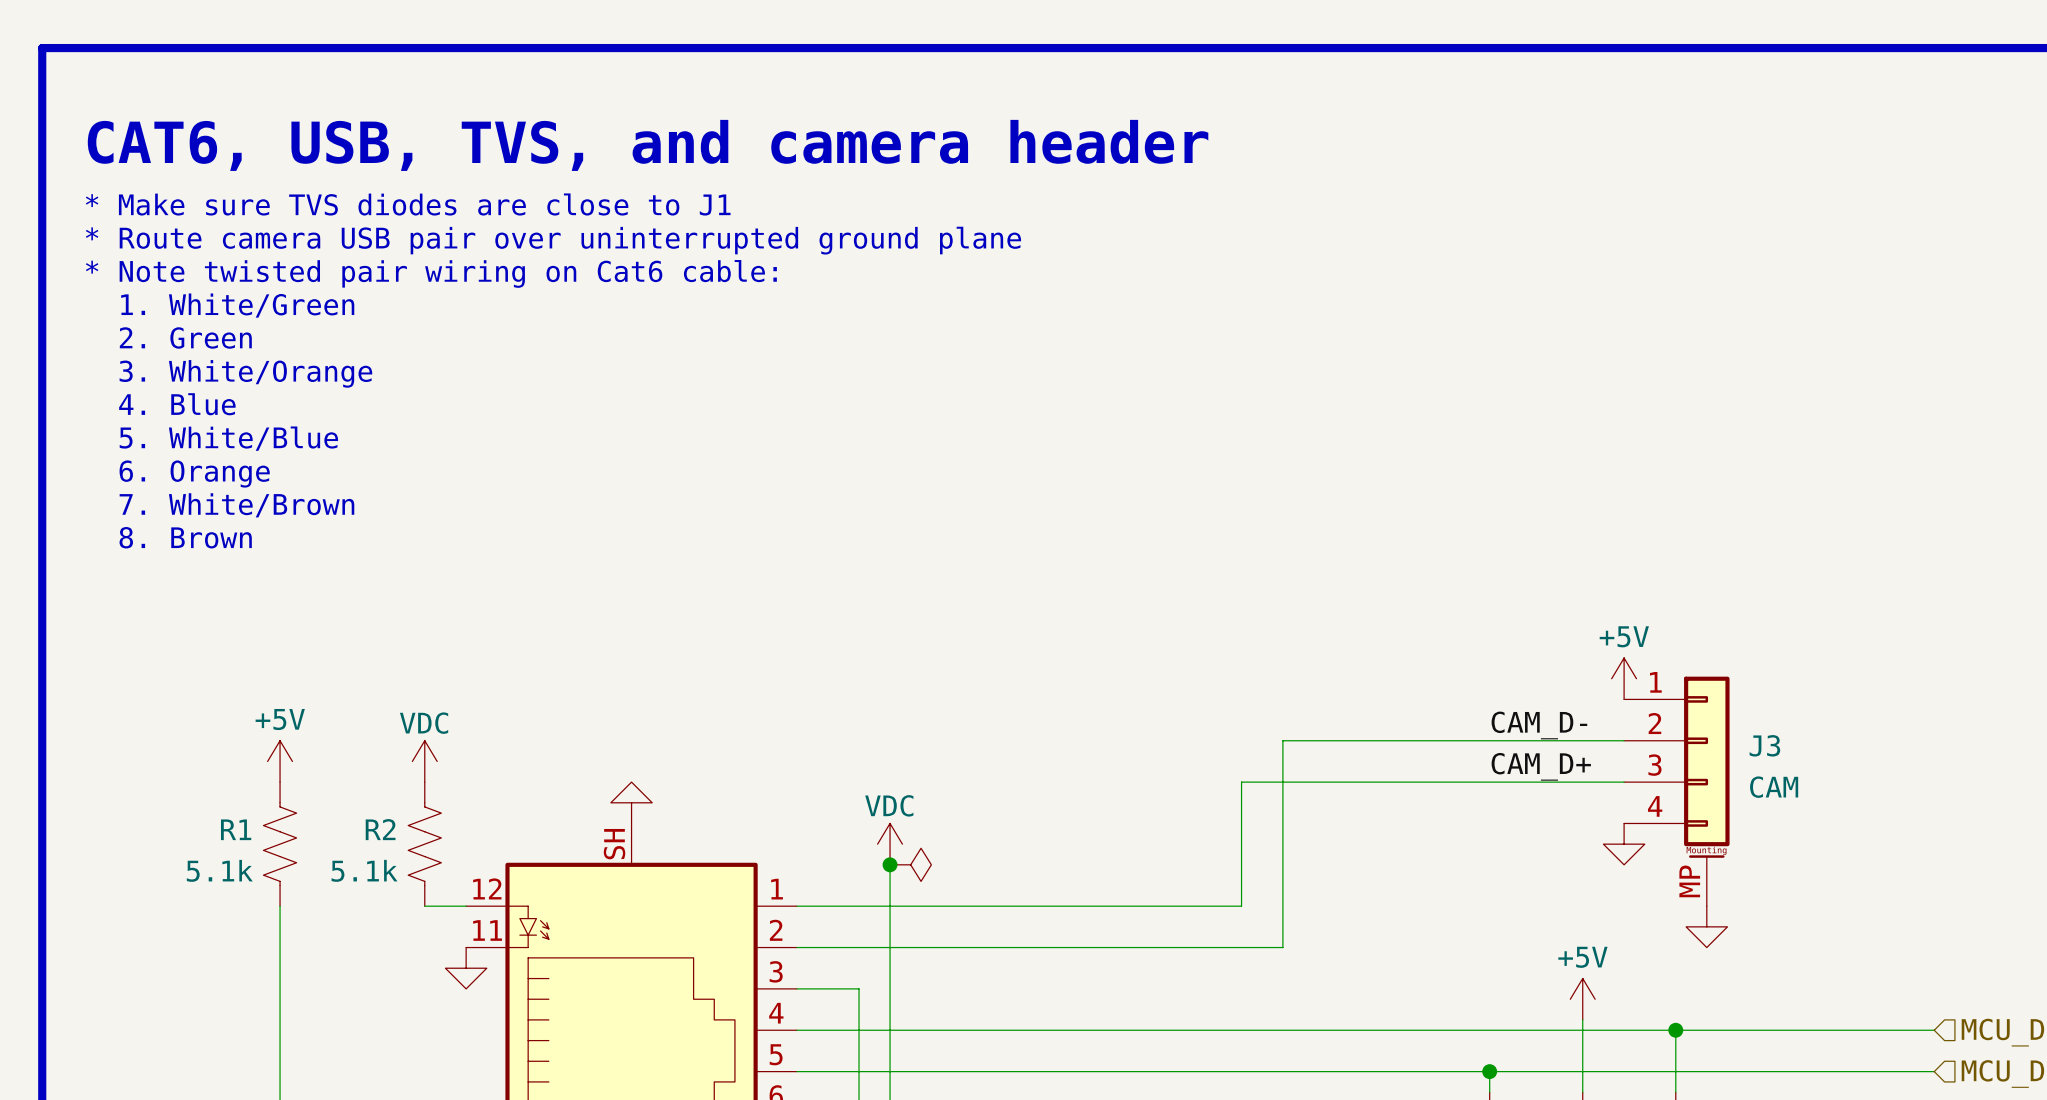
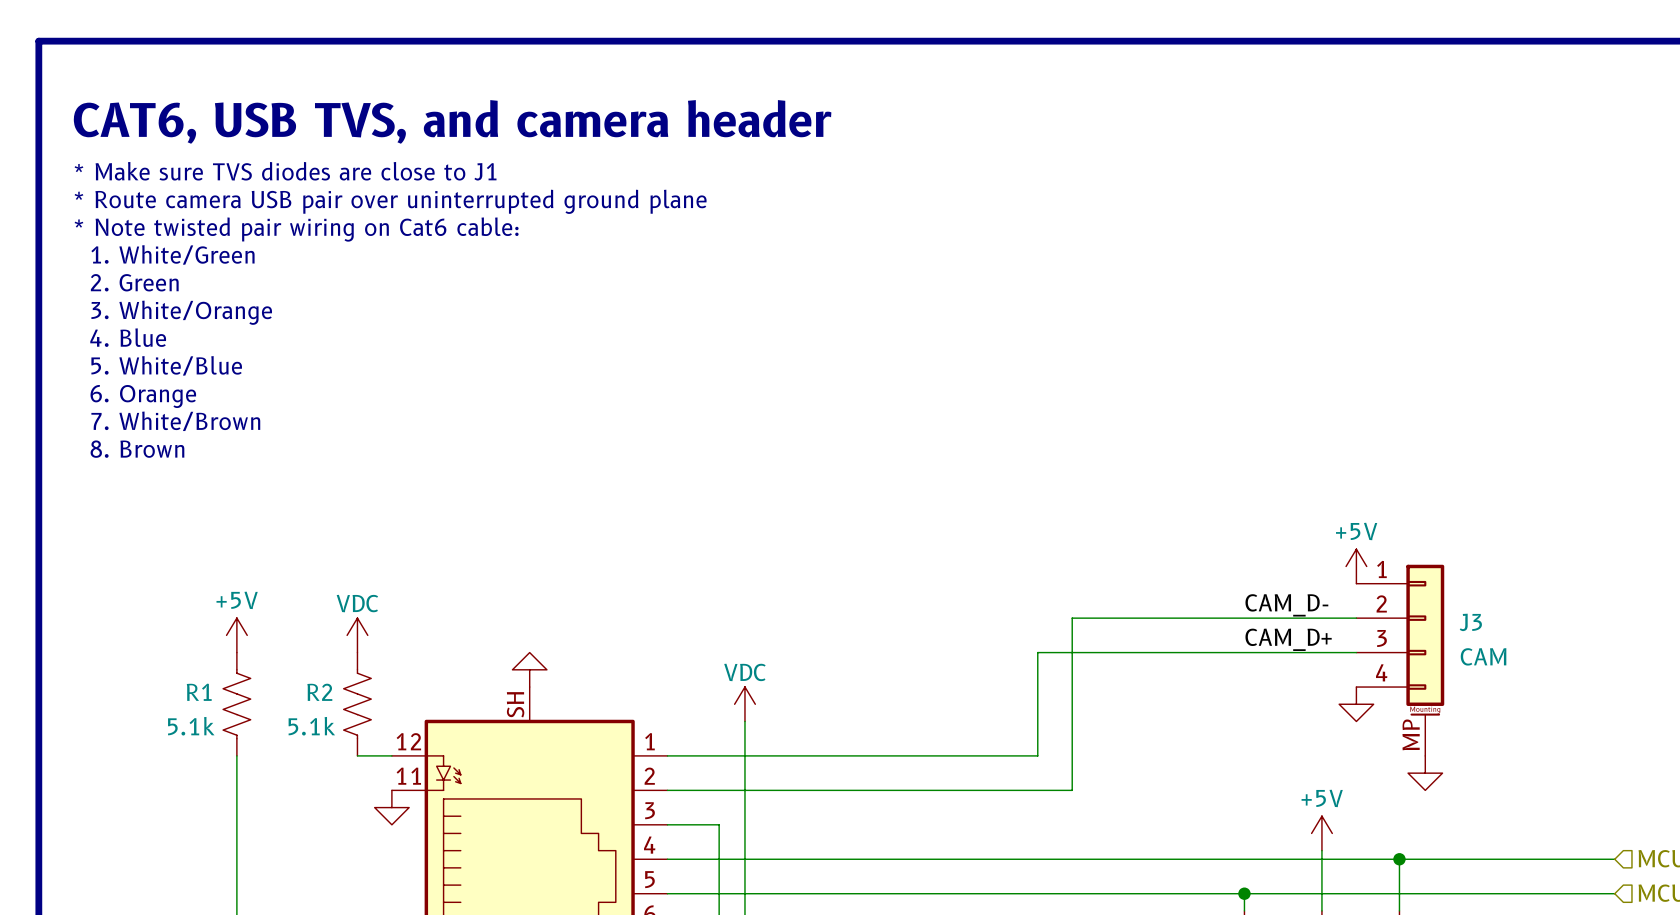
text: CAT6, USB, TVS, and camera header (648, 145) -> CAT6, USB TVS, and camera header (452, 121)
junction: (890, 864) -> none
power symbol: (910, 864) -> none

